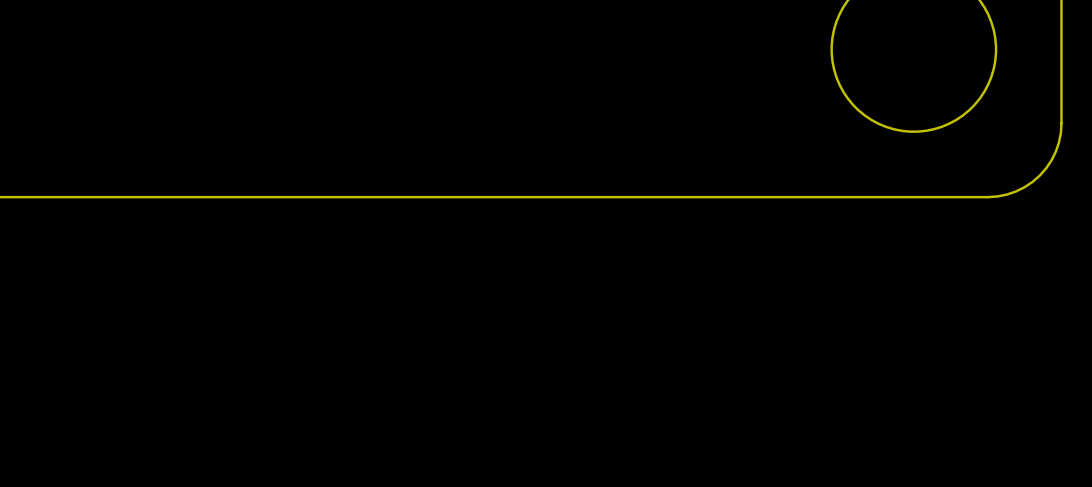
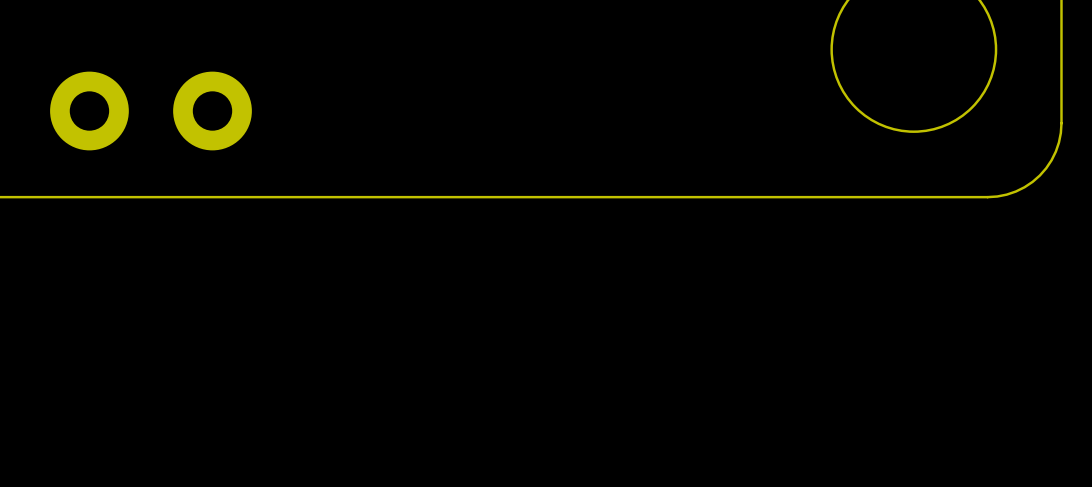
part: none -> (150, 111)

